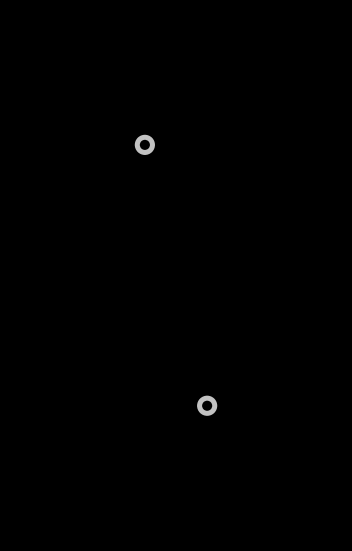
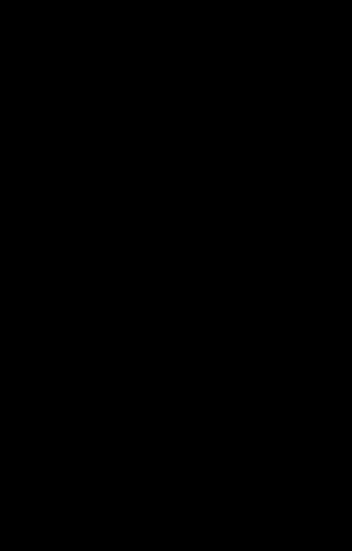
via: (144, 144) -> none
via: (207, 405) -> none

